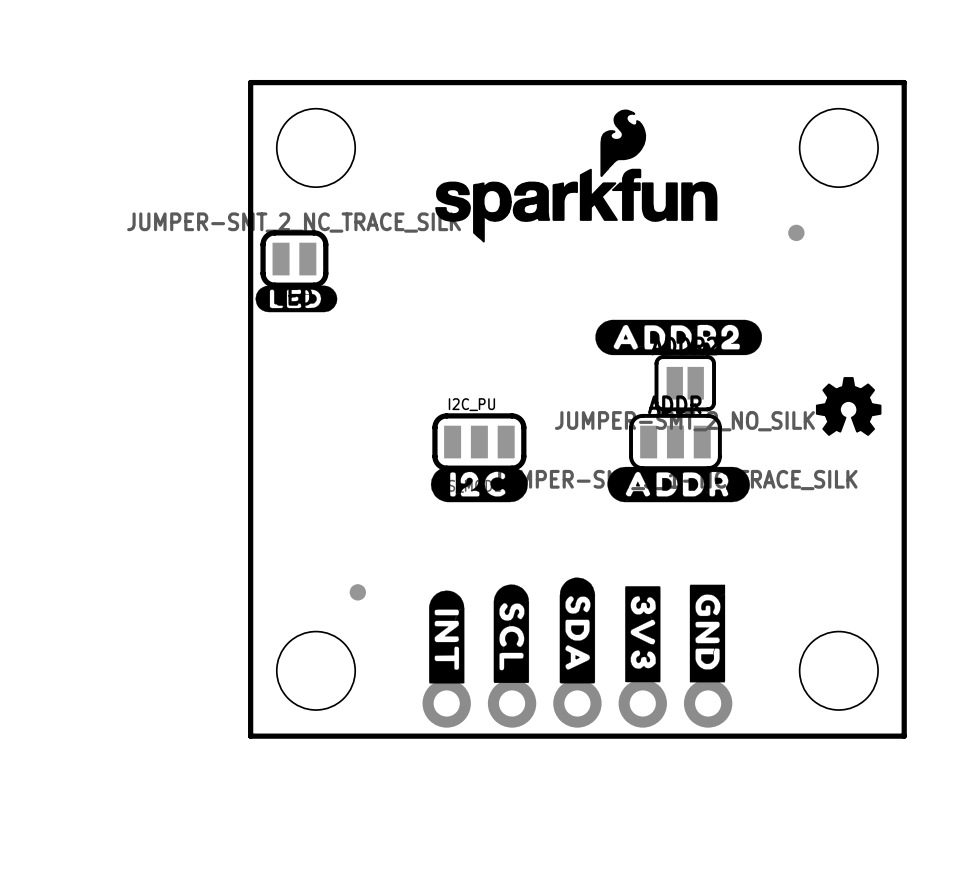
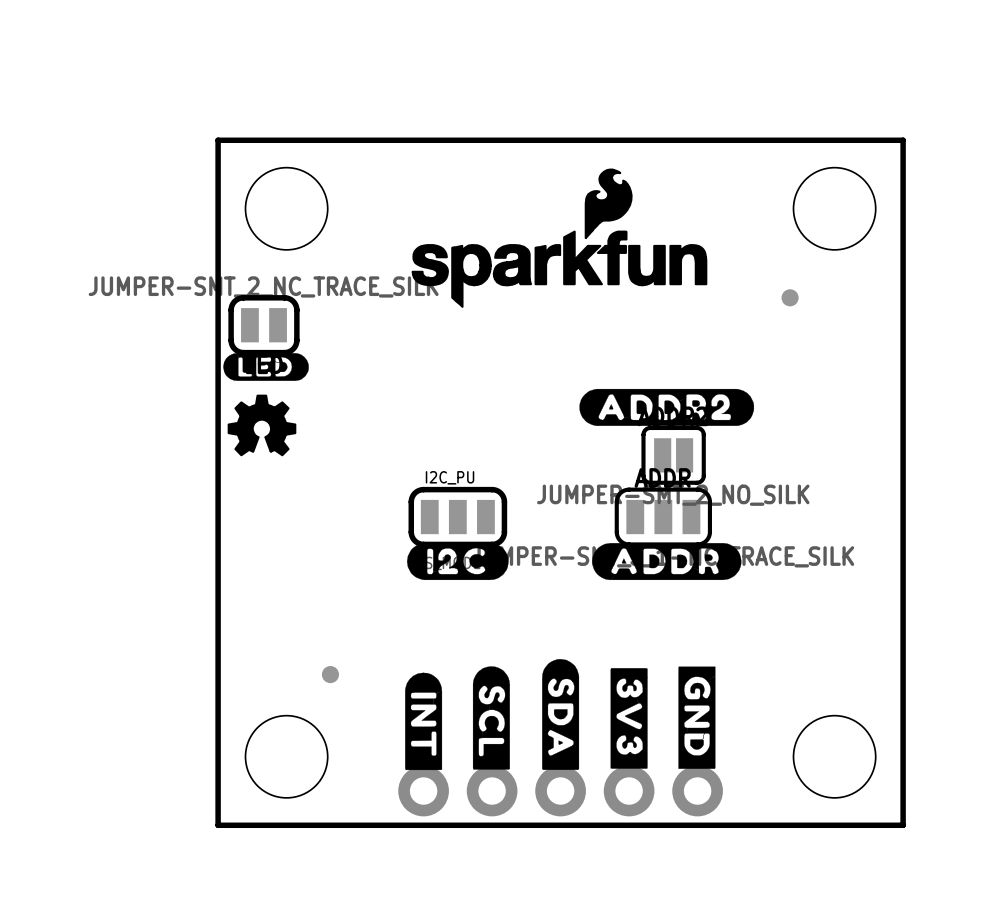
drawing position: (848, 406) -> (261, 425)

